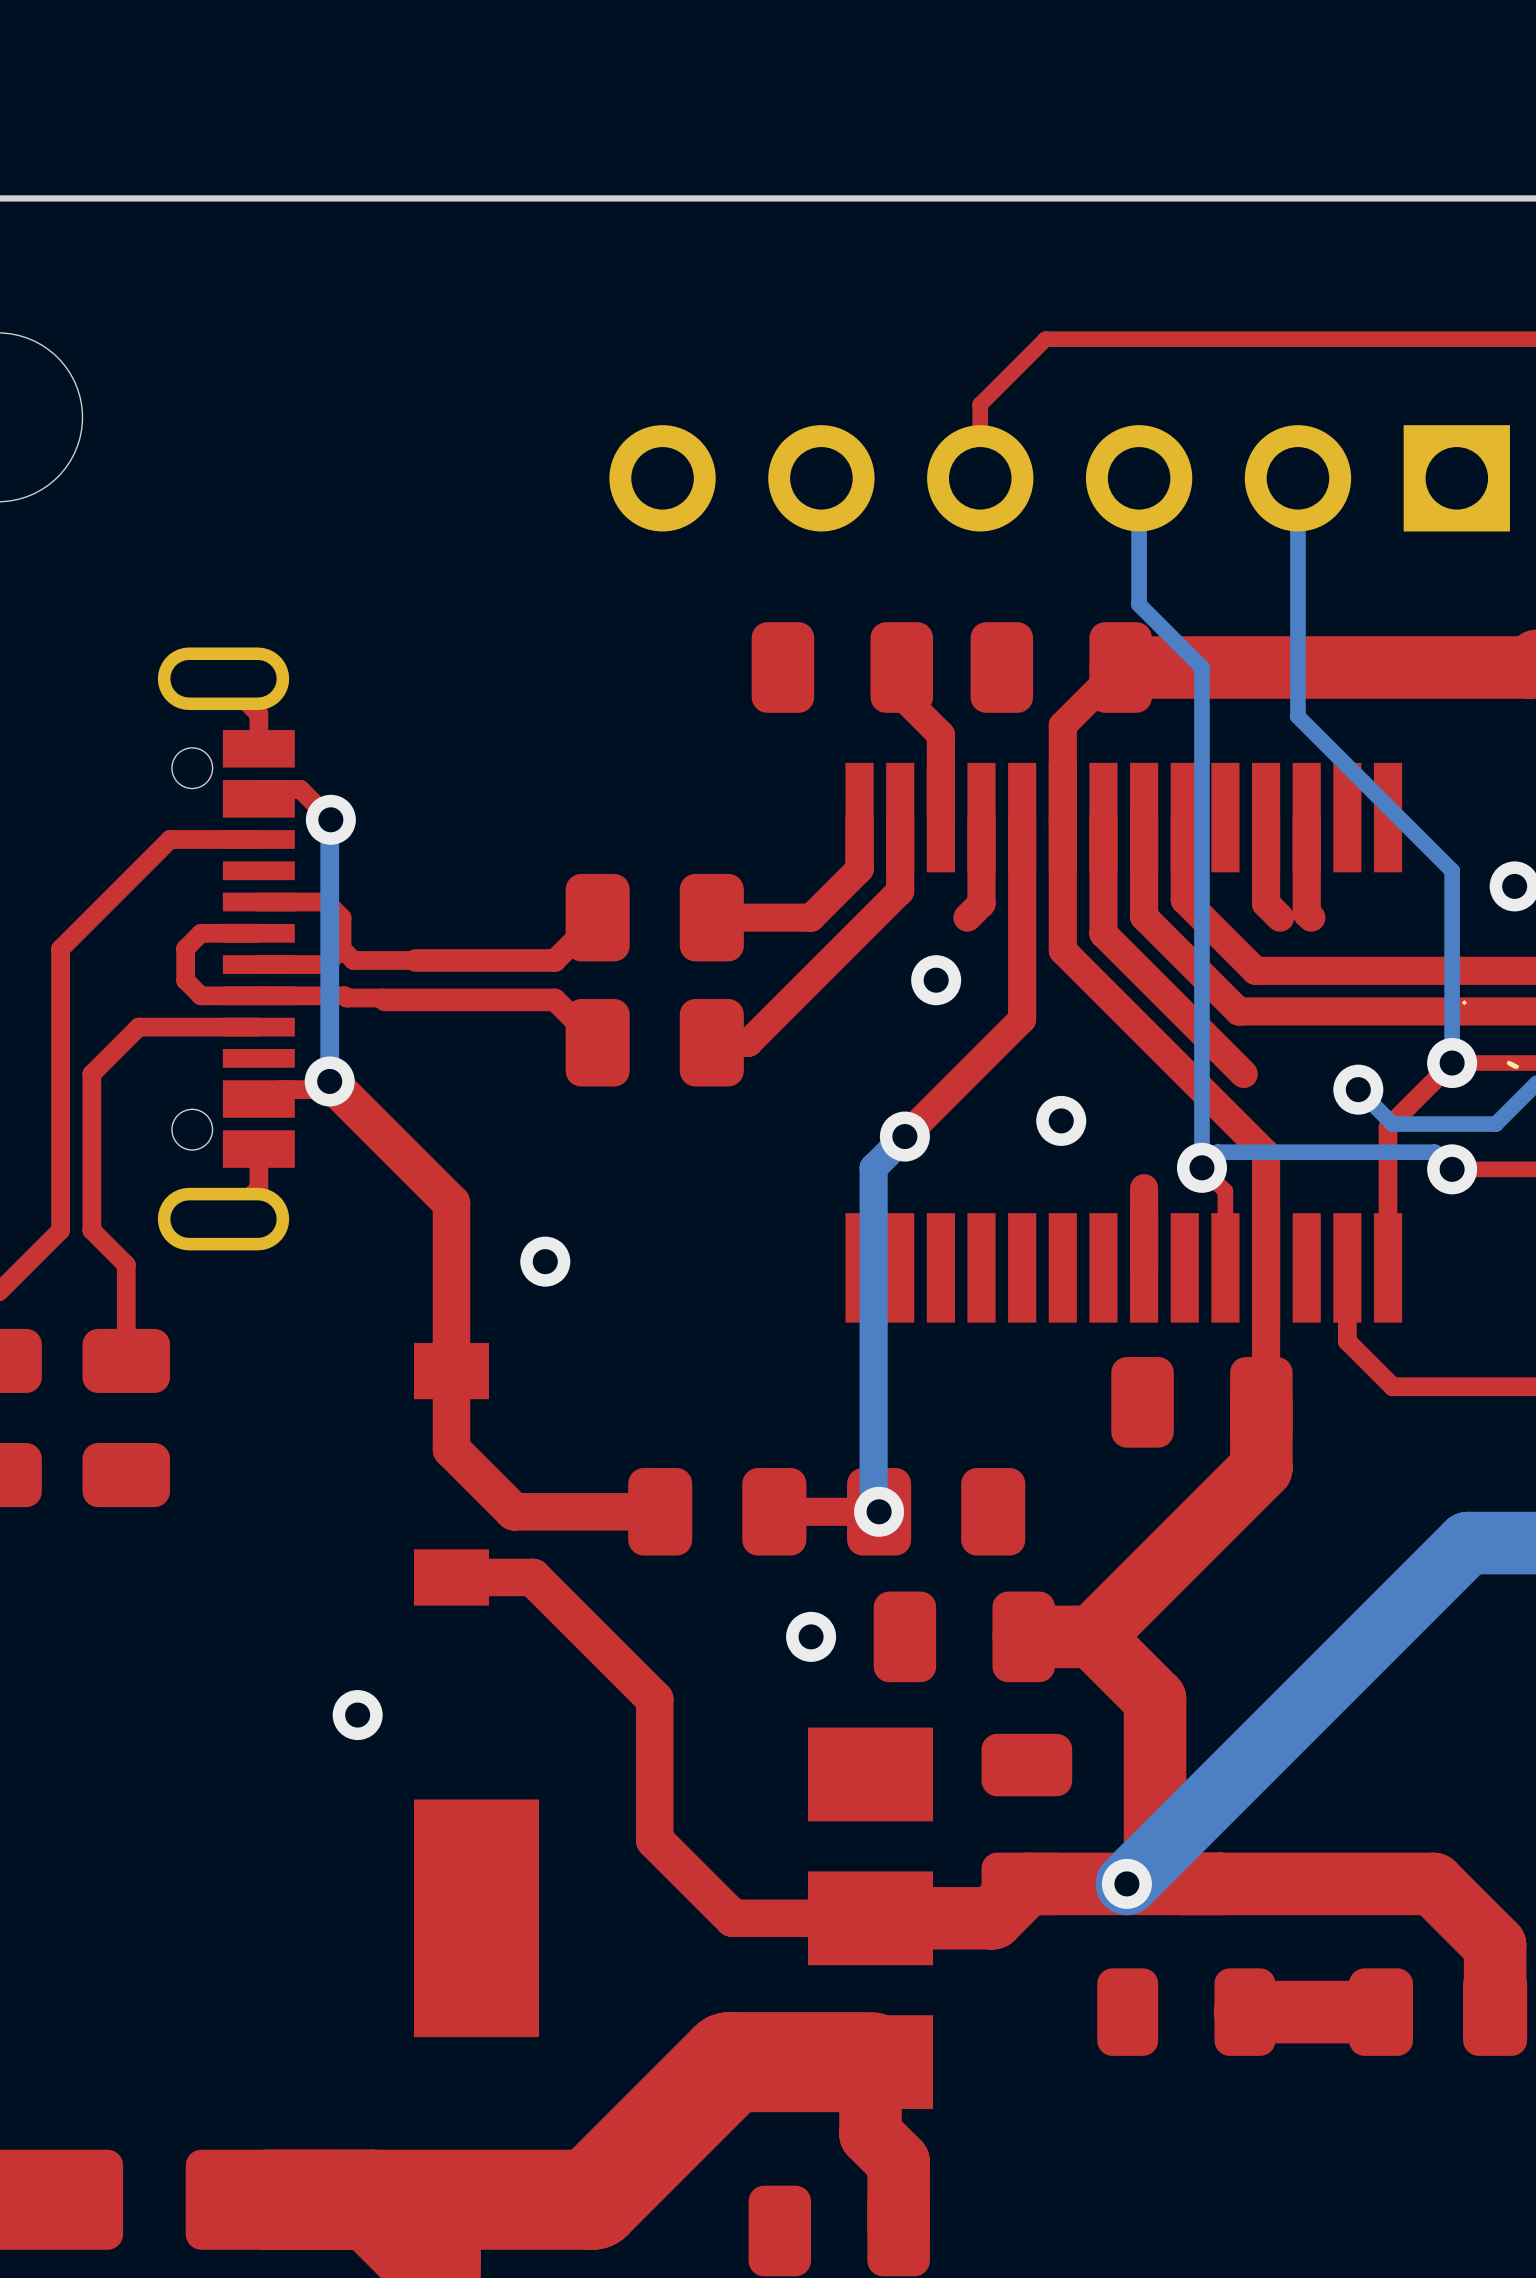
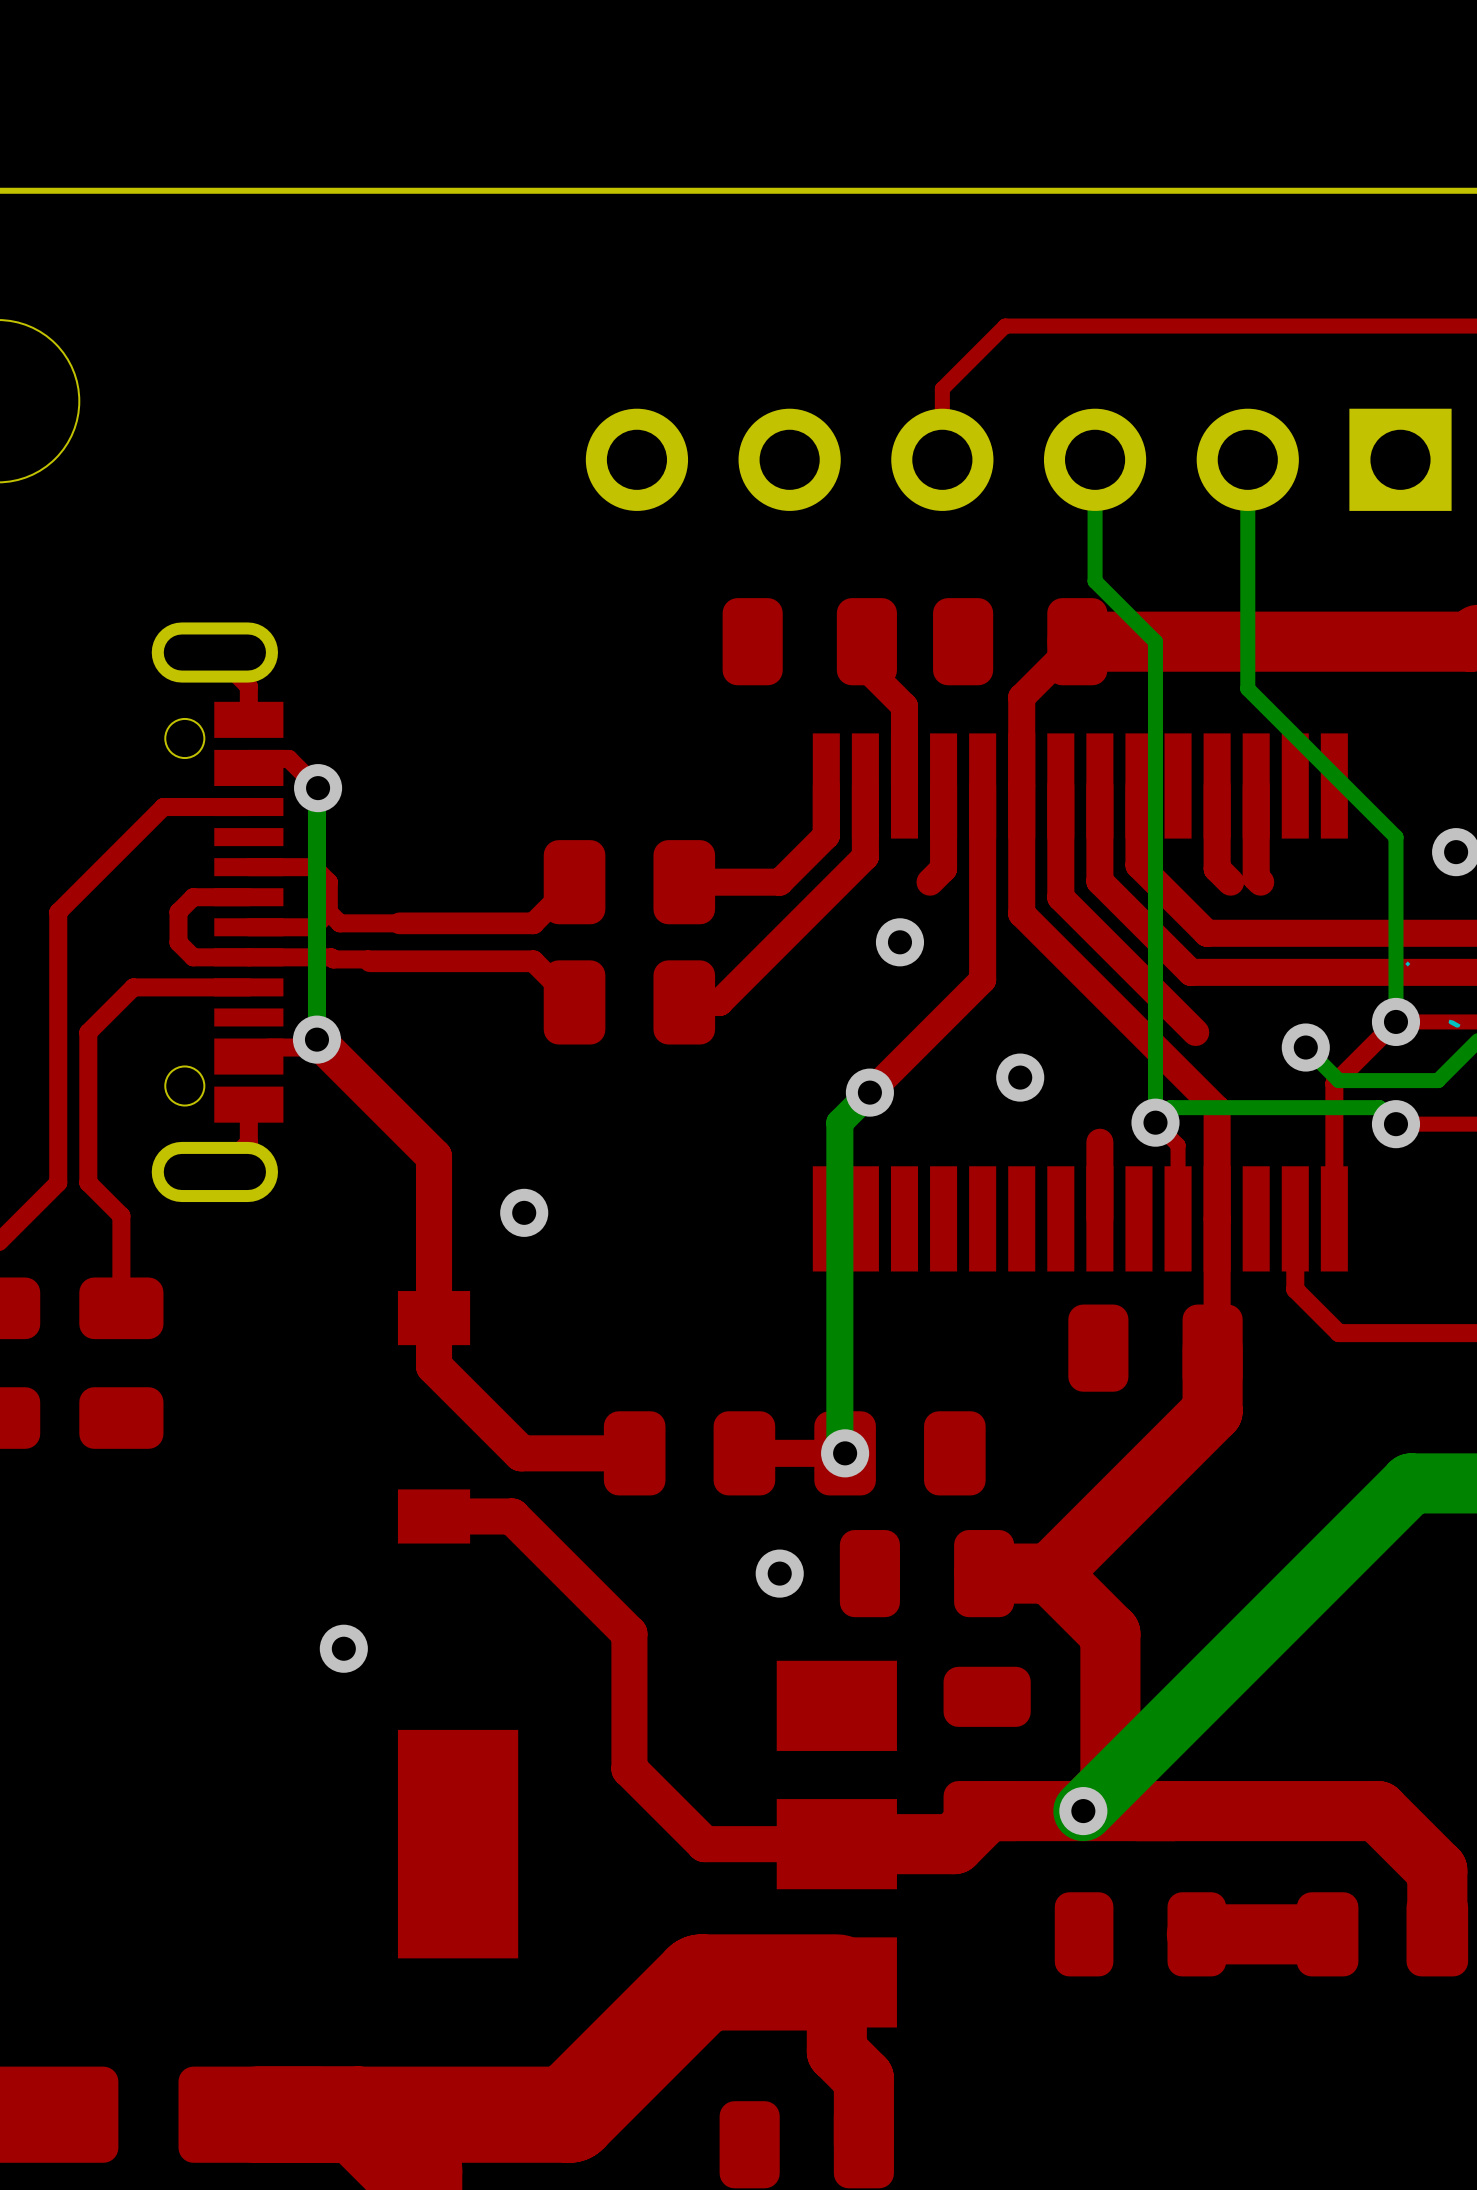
top track: (451, 1421) (451, 1449) (514, 1511) (542, 1511) -> (434, 1366) (521, 1453)

